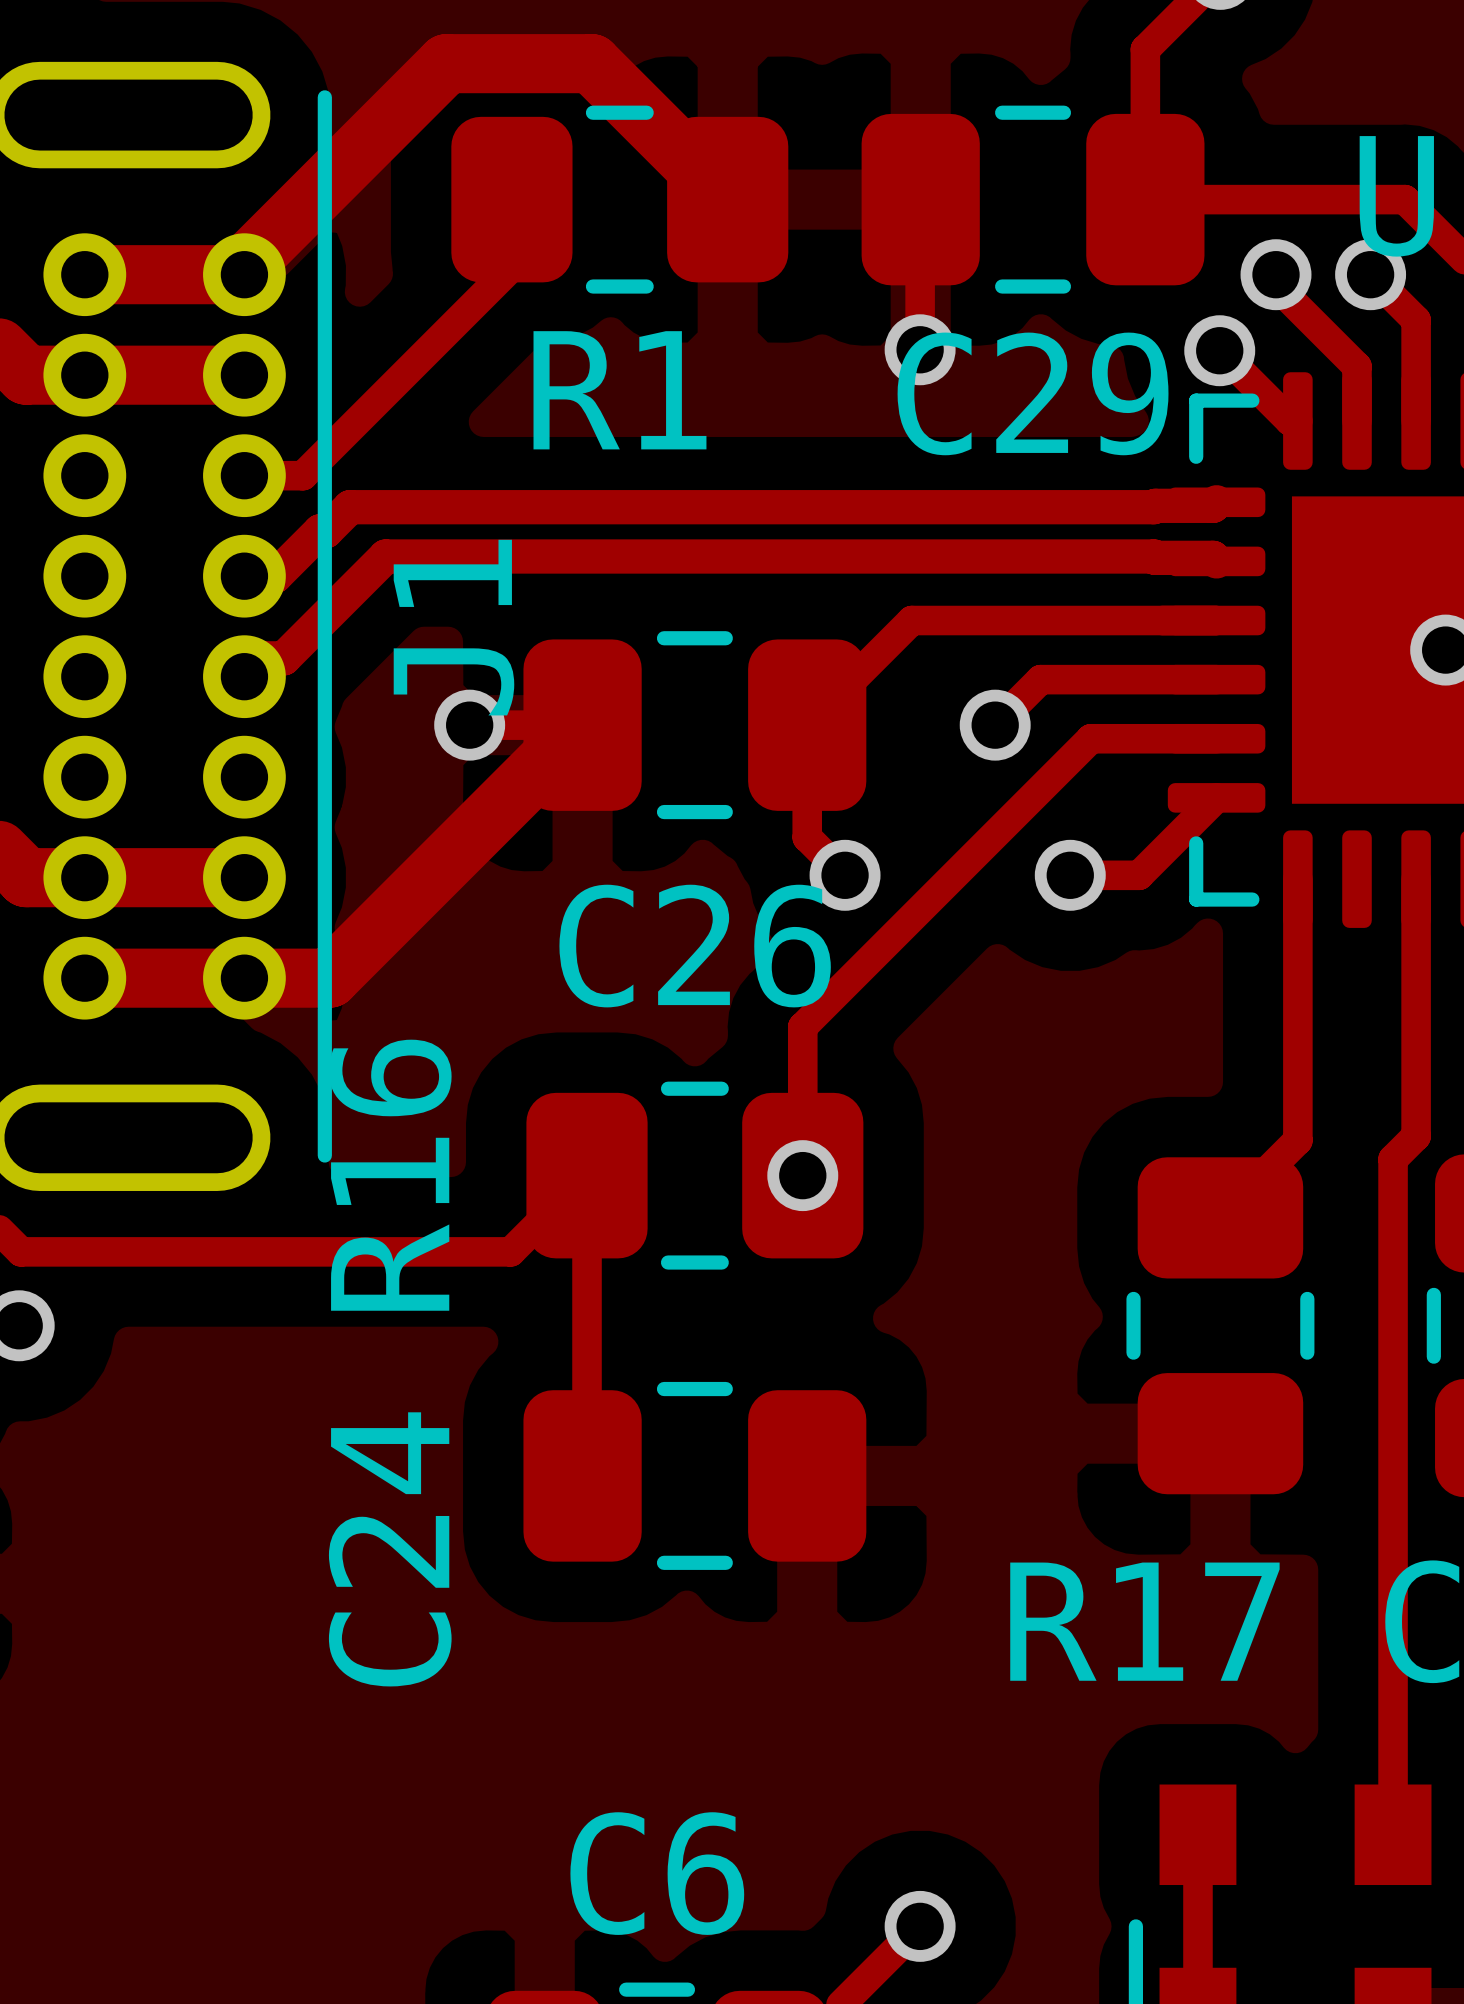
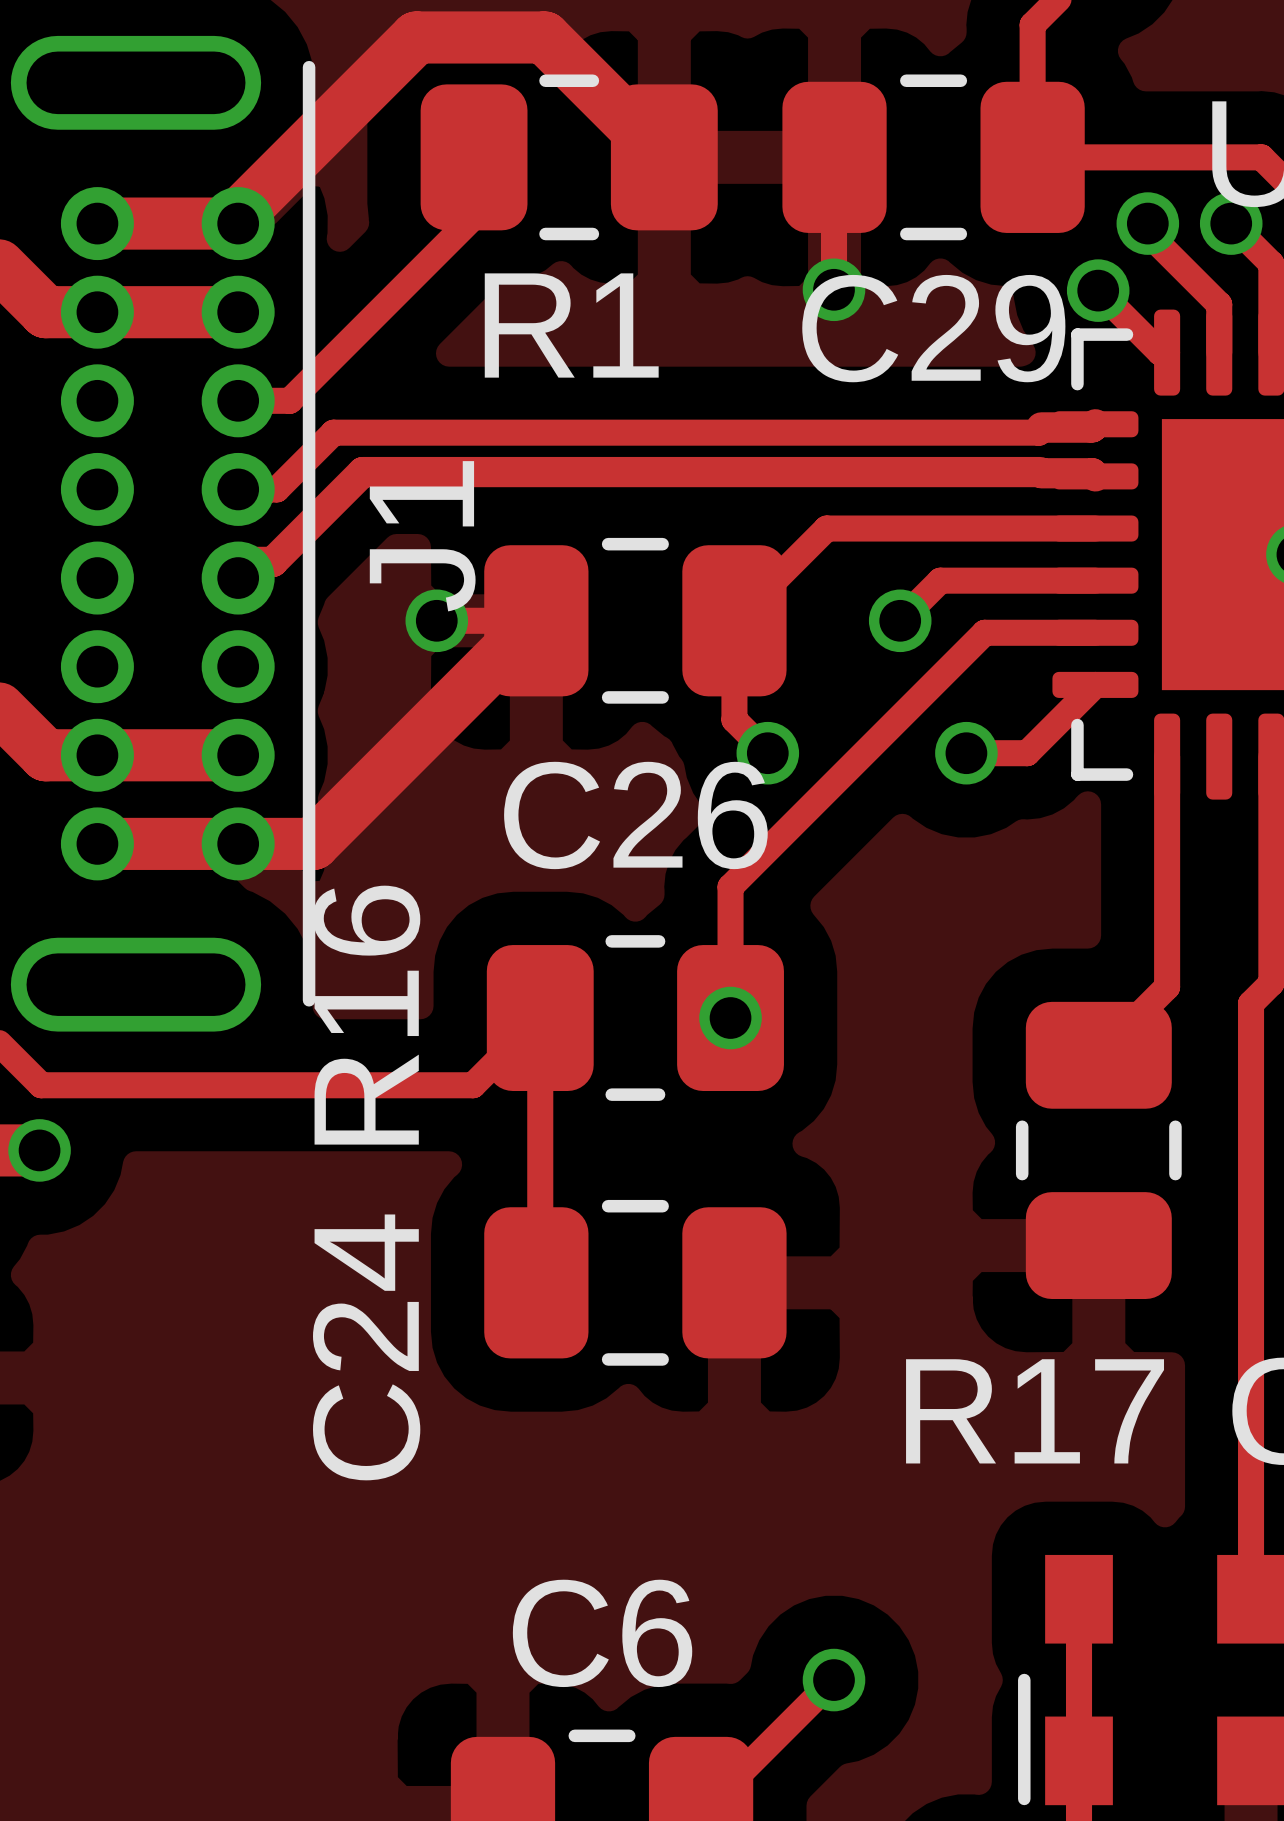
track: (1153, 507) (350, 507) (325, 531) (320, 531) (275, 576) -> (1095, 424) (1090, 429) (1042, 429) (1039, 432) (333, 432) (276, 489) (265, 489)

